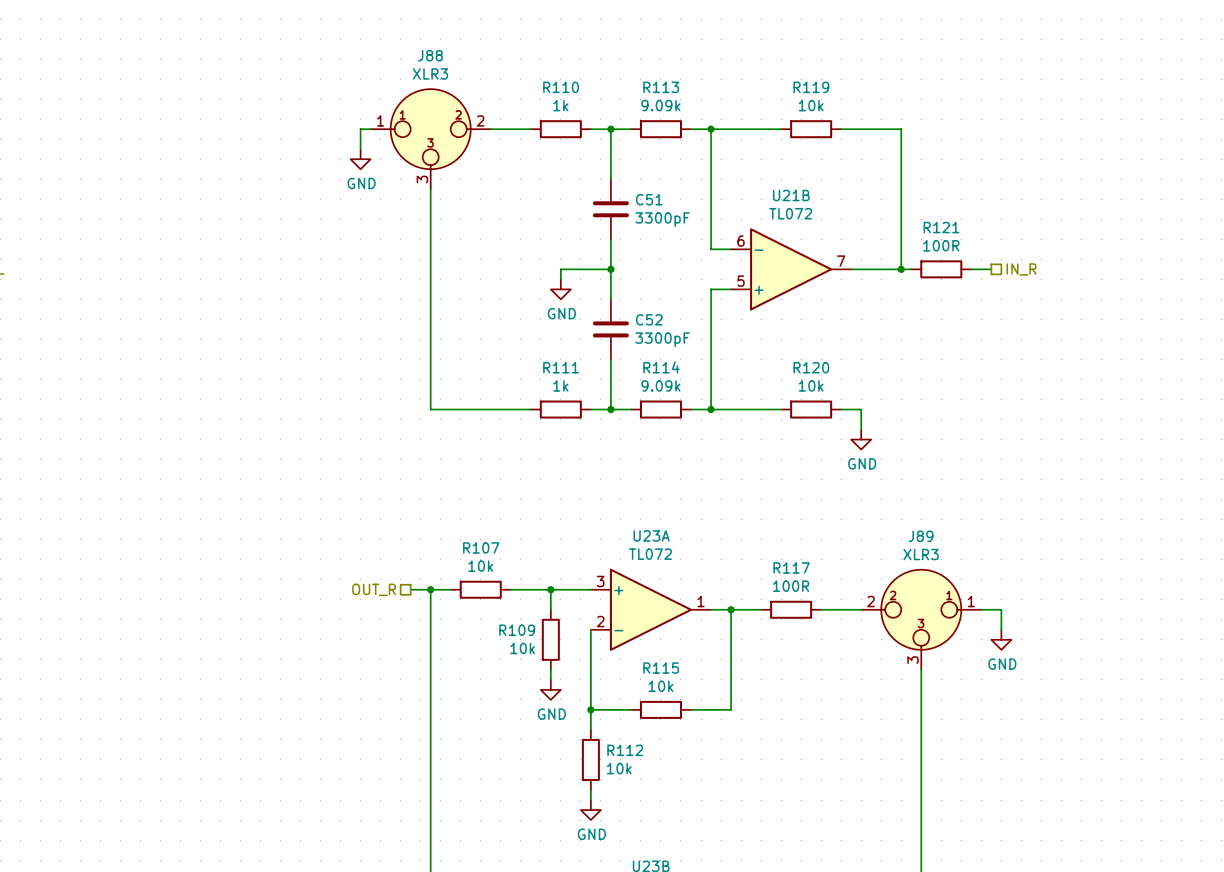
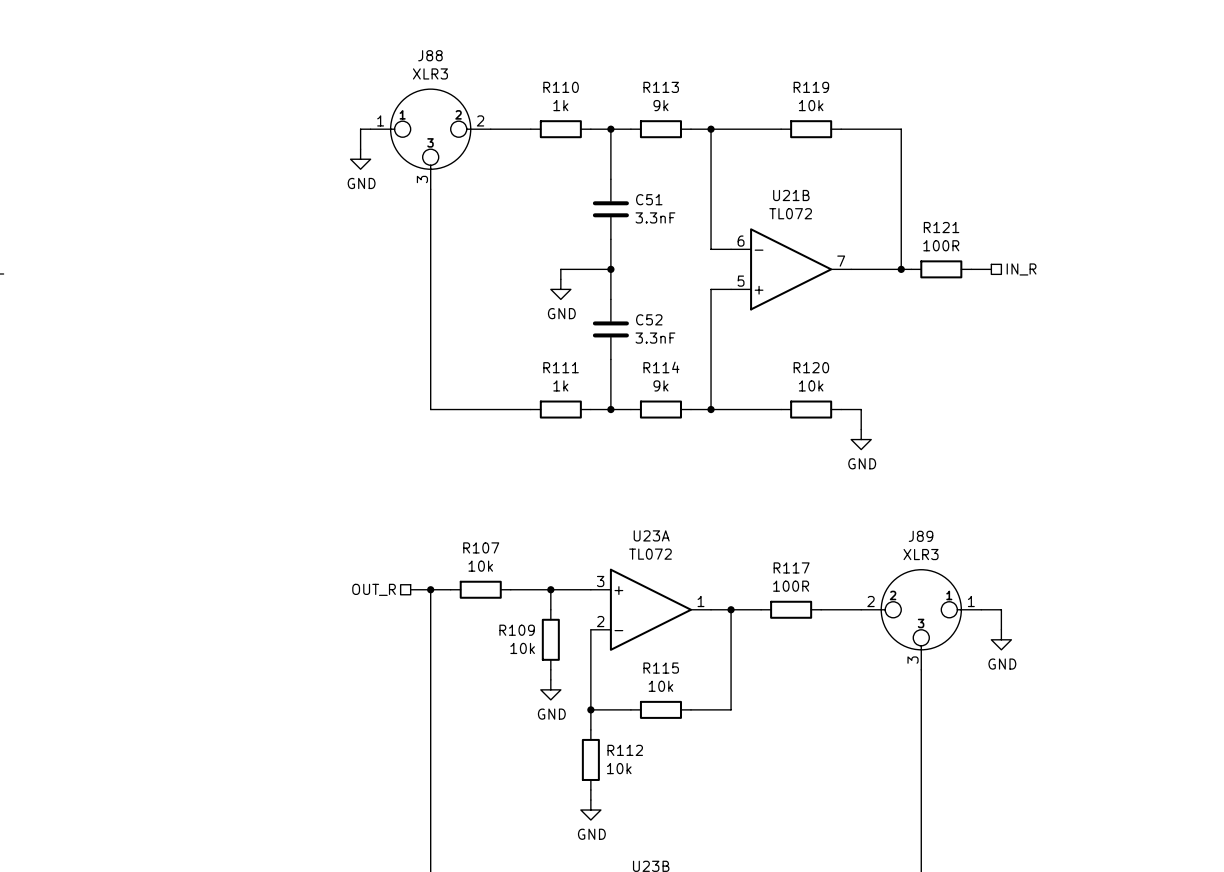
R113 value: 9.09k (660, 105) -> 9k (660, 105)
C51 value: 3300pF (662, 219) -> 3.3nF (655, 217)
C52 value: 3300pF (662, 339) -> 3.3nF (655, 338)
R114 value: 9.09k (660, 385) -> 9k (660, 385)

